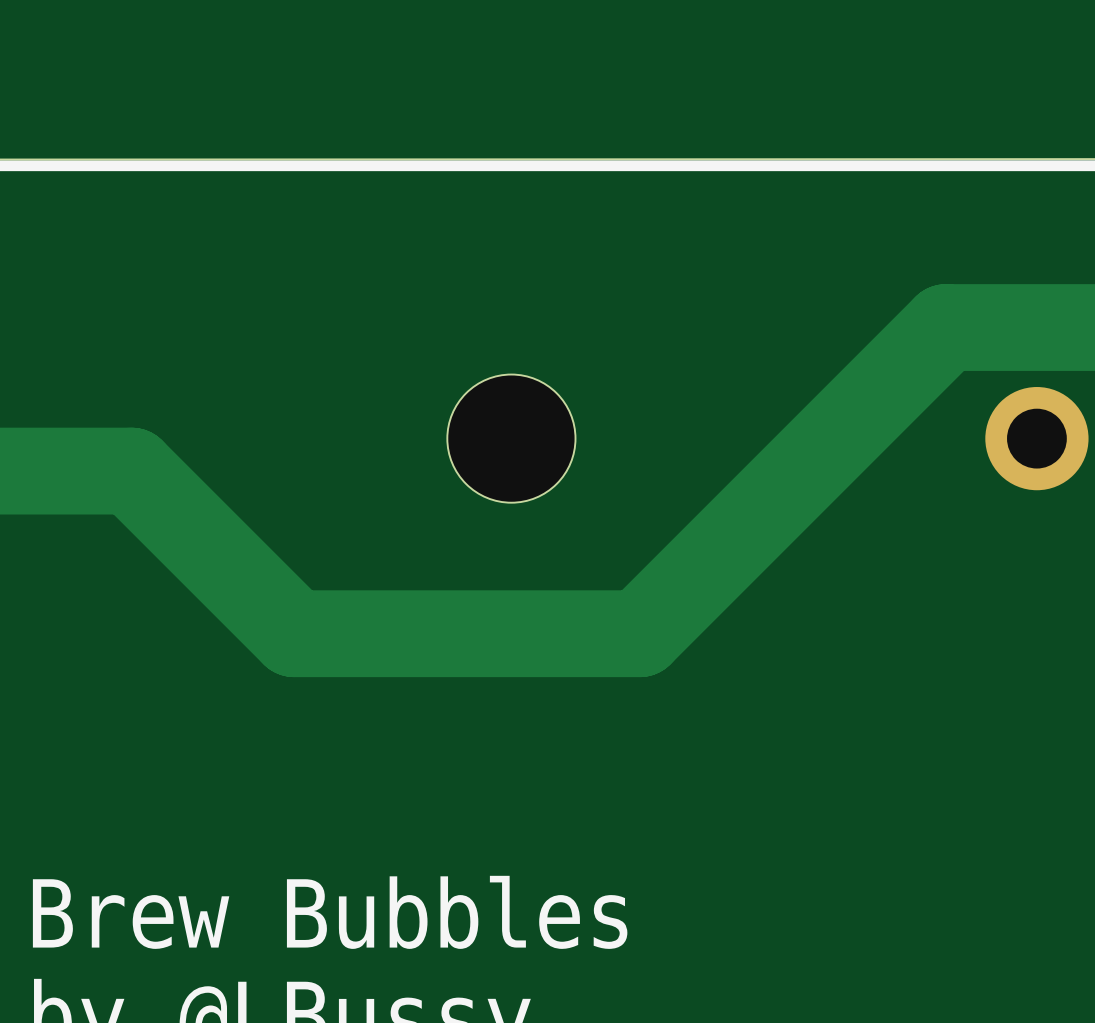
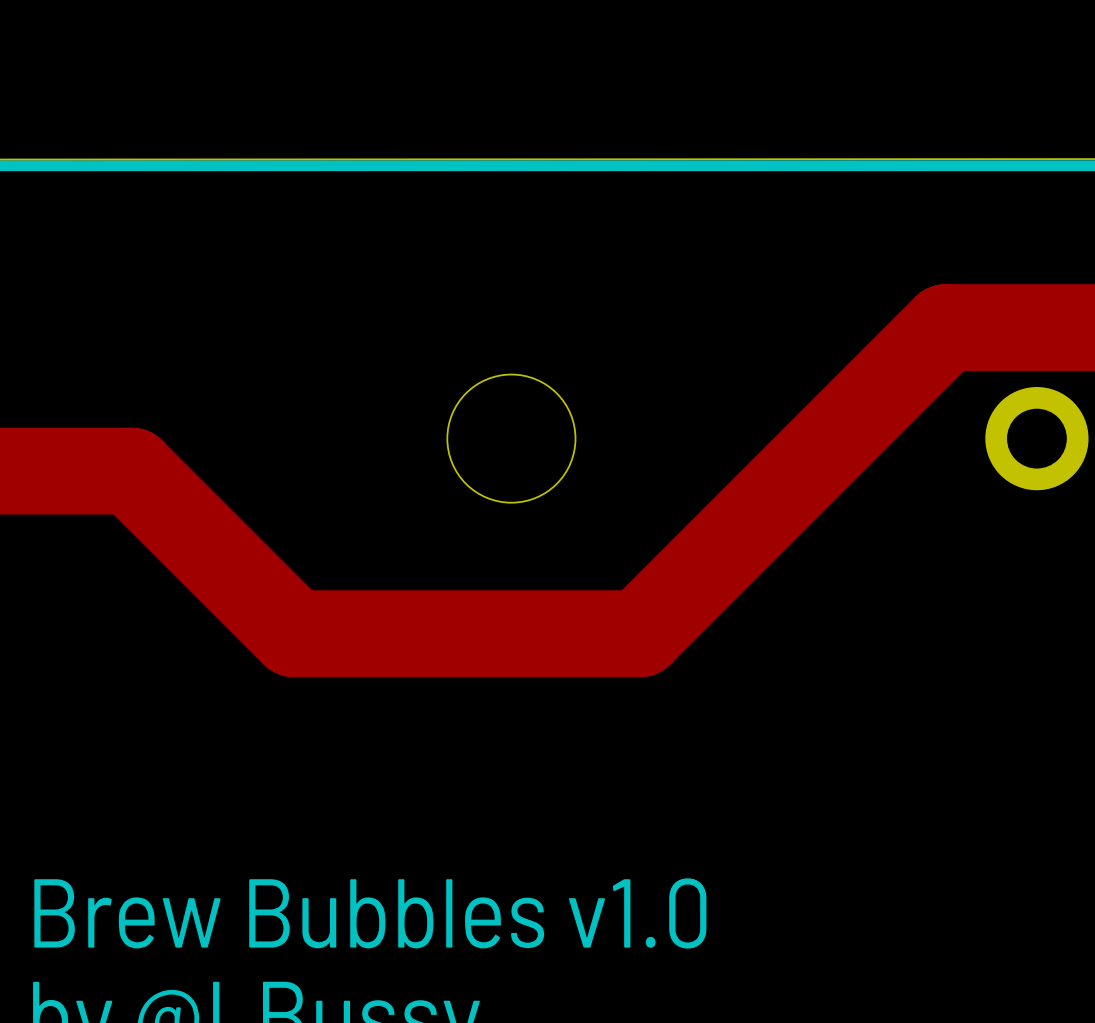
text: Brew Bubbles (330, 912) -> Brew Bubbles v1.0 (370, 913)

